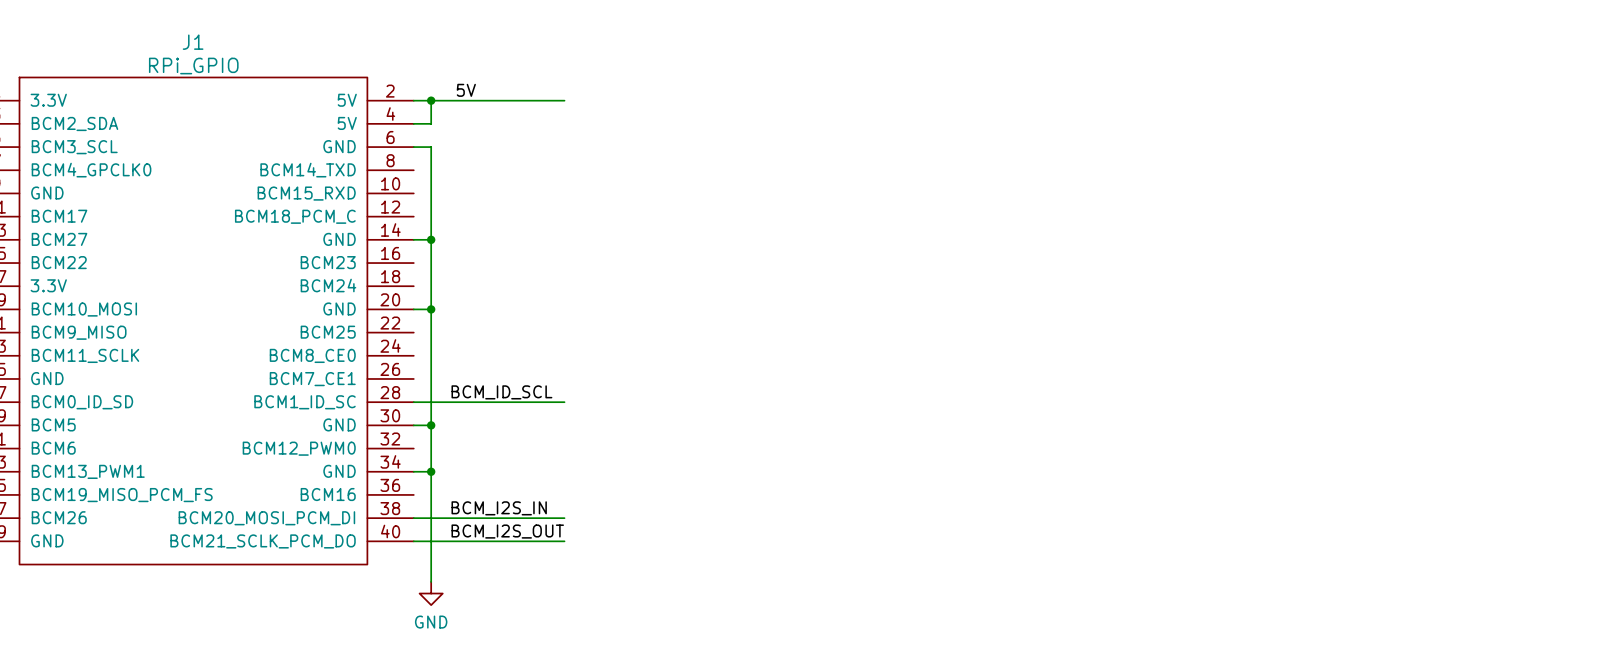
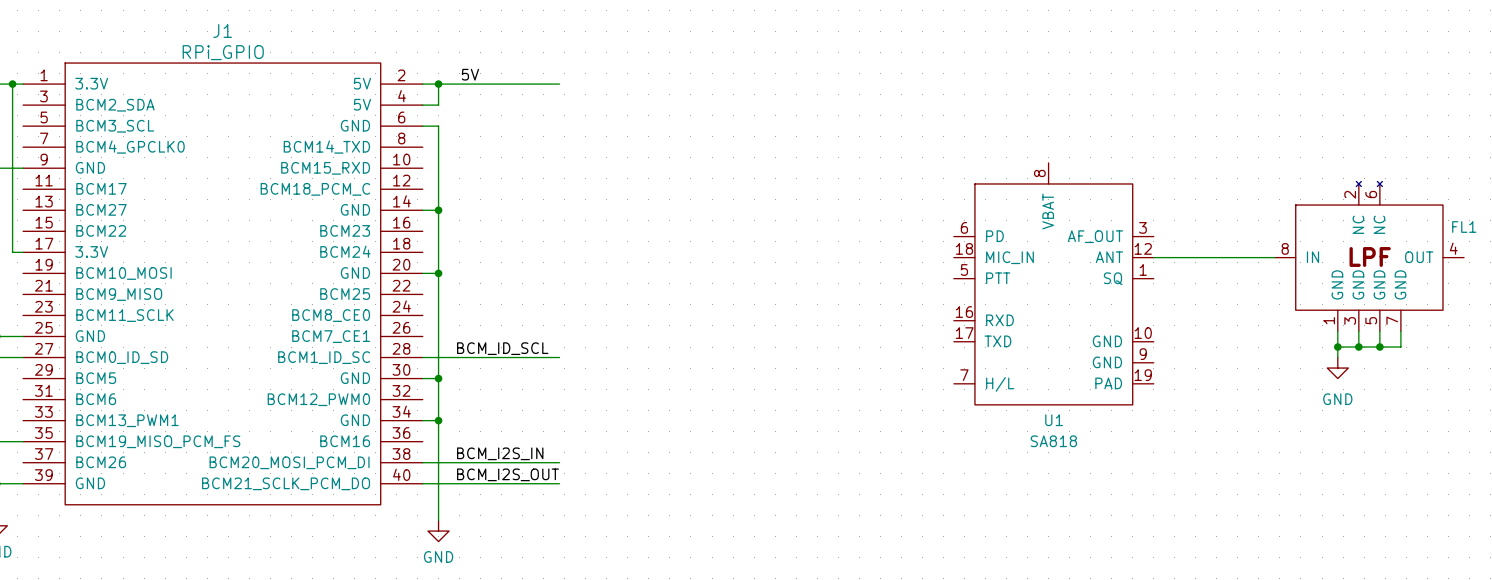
FL1: none -> (1369, 256)
wire: none -> (1153, 257) (1274, 257)
U1: none -> SA818 (1053, 283)
wire: none -> (1337, 331) (1337, 357)
wire: none -> (1358, 331) (1358, 347)
wire: none -> (1379, 331) (1379, 347)
wire: none -> (1400, 331) (1400, 347) (1337, 347)
junction: none -> (1337, 347)
junction: none -> (1358, 347)
junction: none -> (1379, 347)
power symbol: none -> GND (1337, 368)

